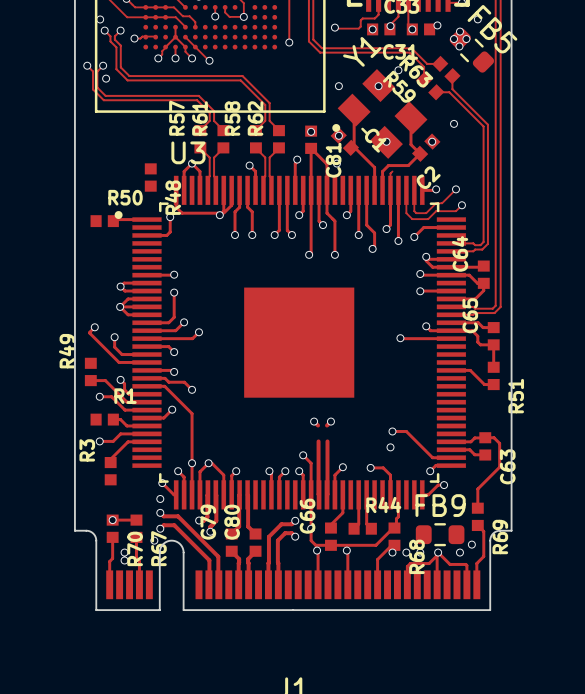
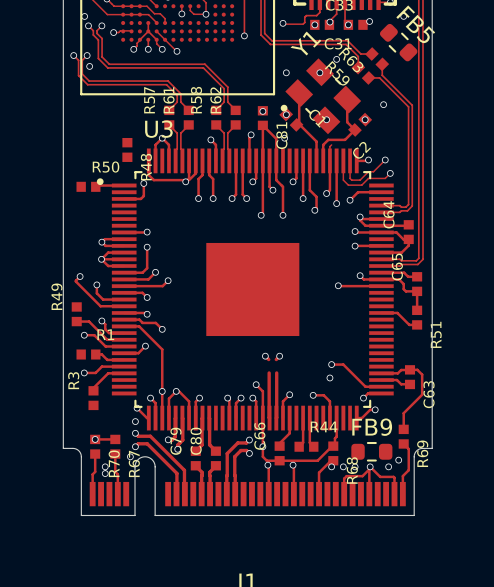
via: (459, 31) -> none
via: (454, 39) -> none
via: (466, 39) -> none
via: (459, 46) -> none

